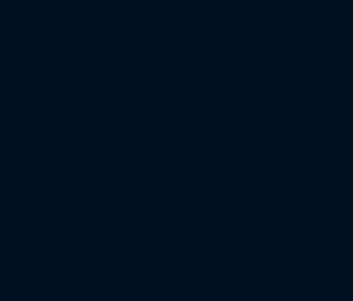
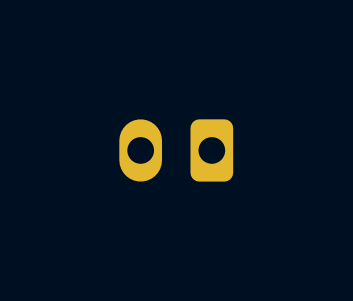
part: none -> (176, 150)

